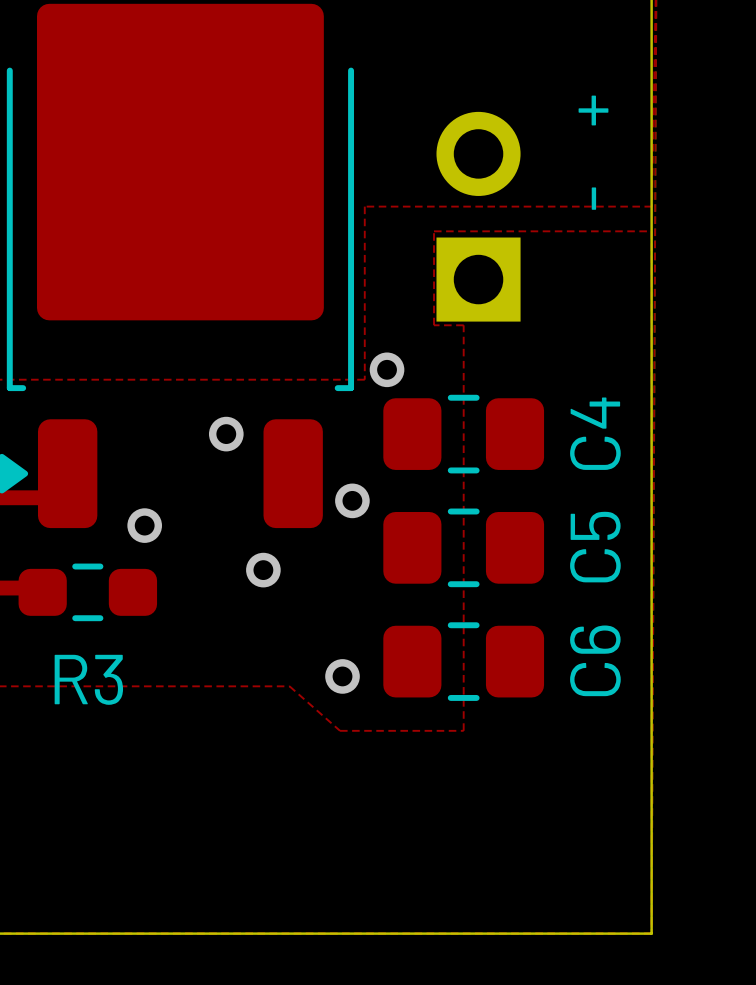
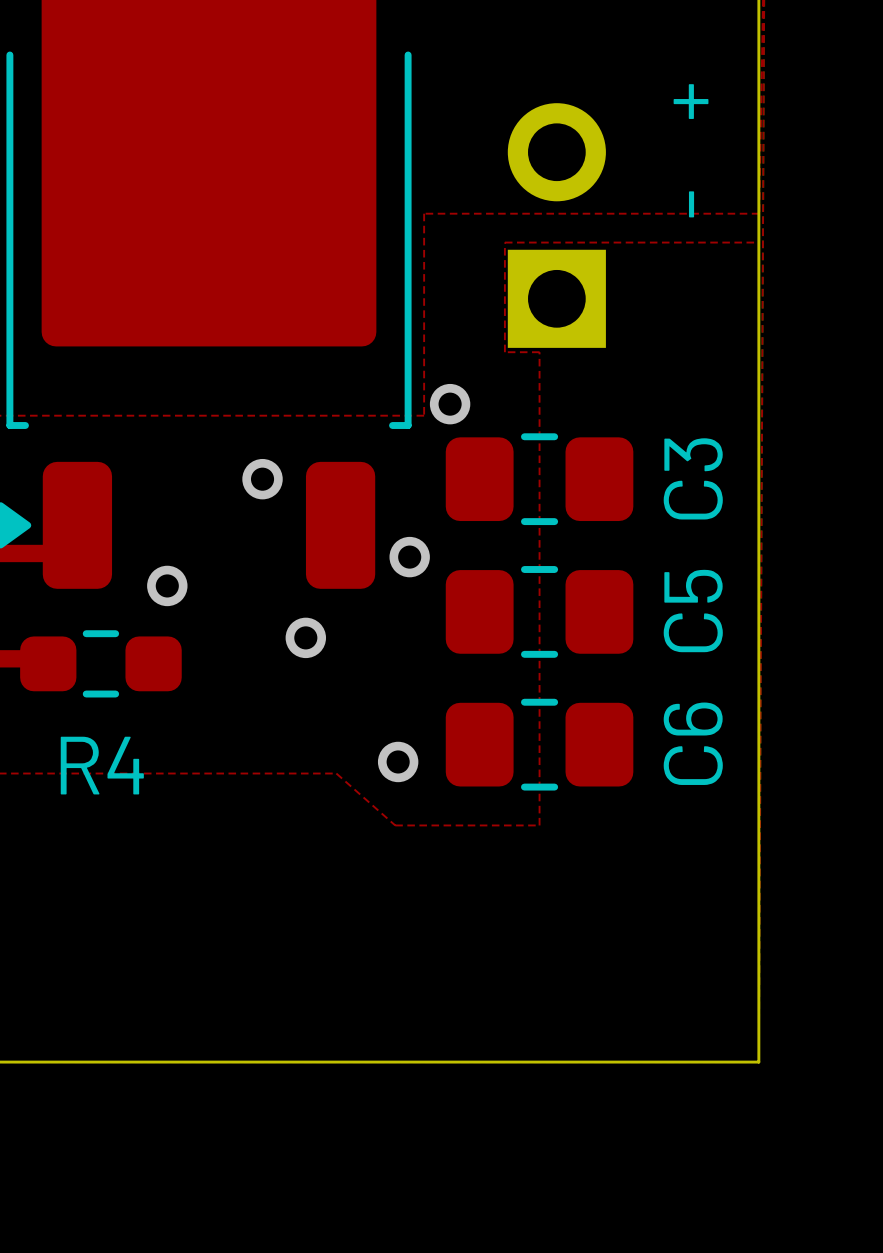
C4 name: C4 (595, 433) -> C3 (693, 478)
R3 name: R3 (88, 679) -> R4 (102, 765)

